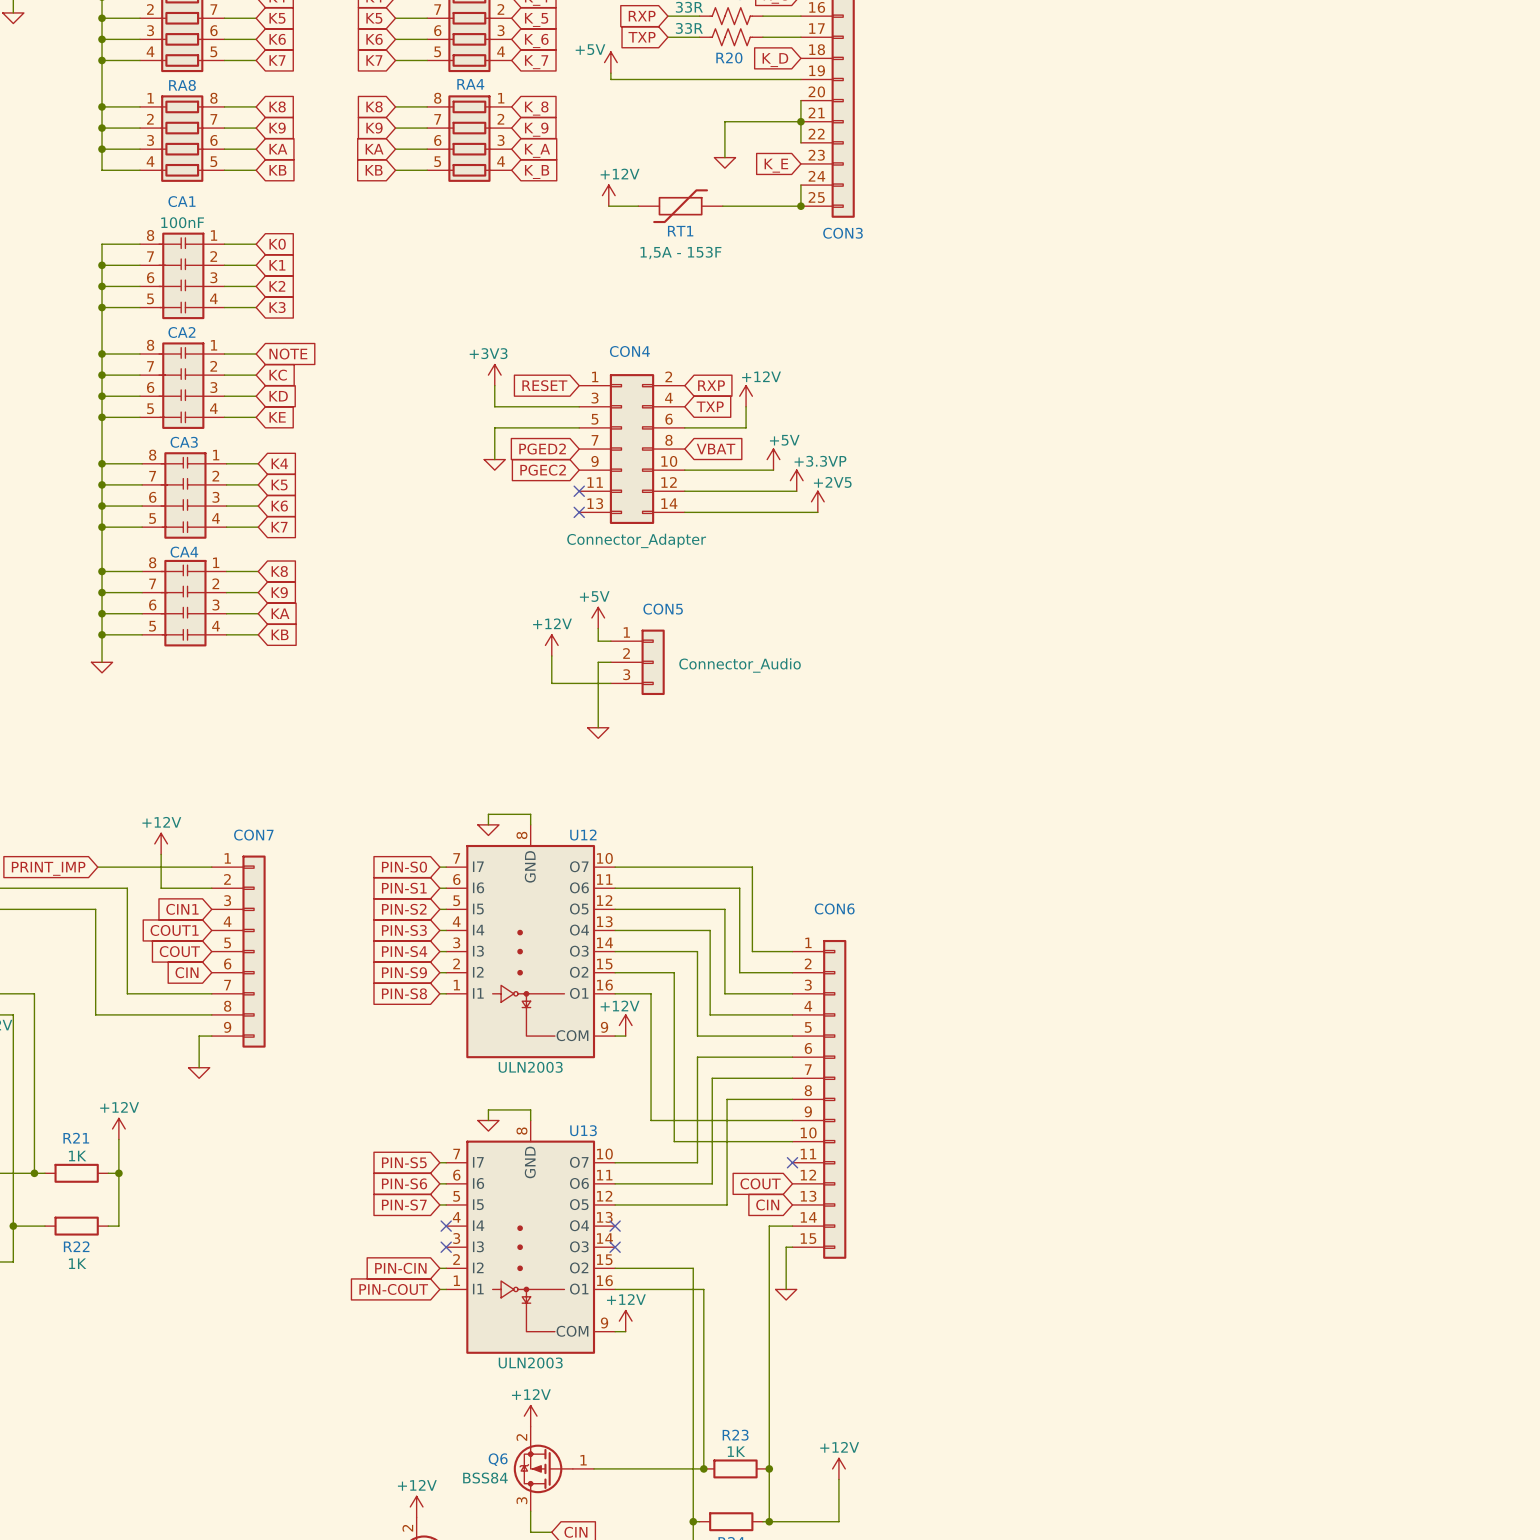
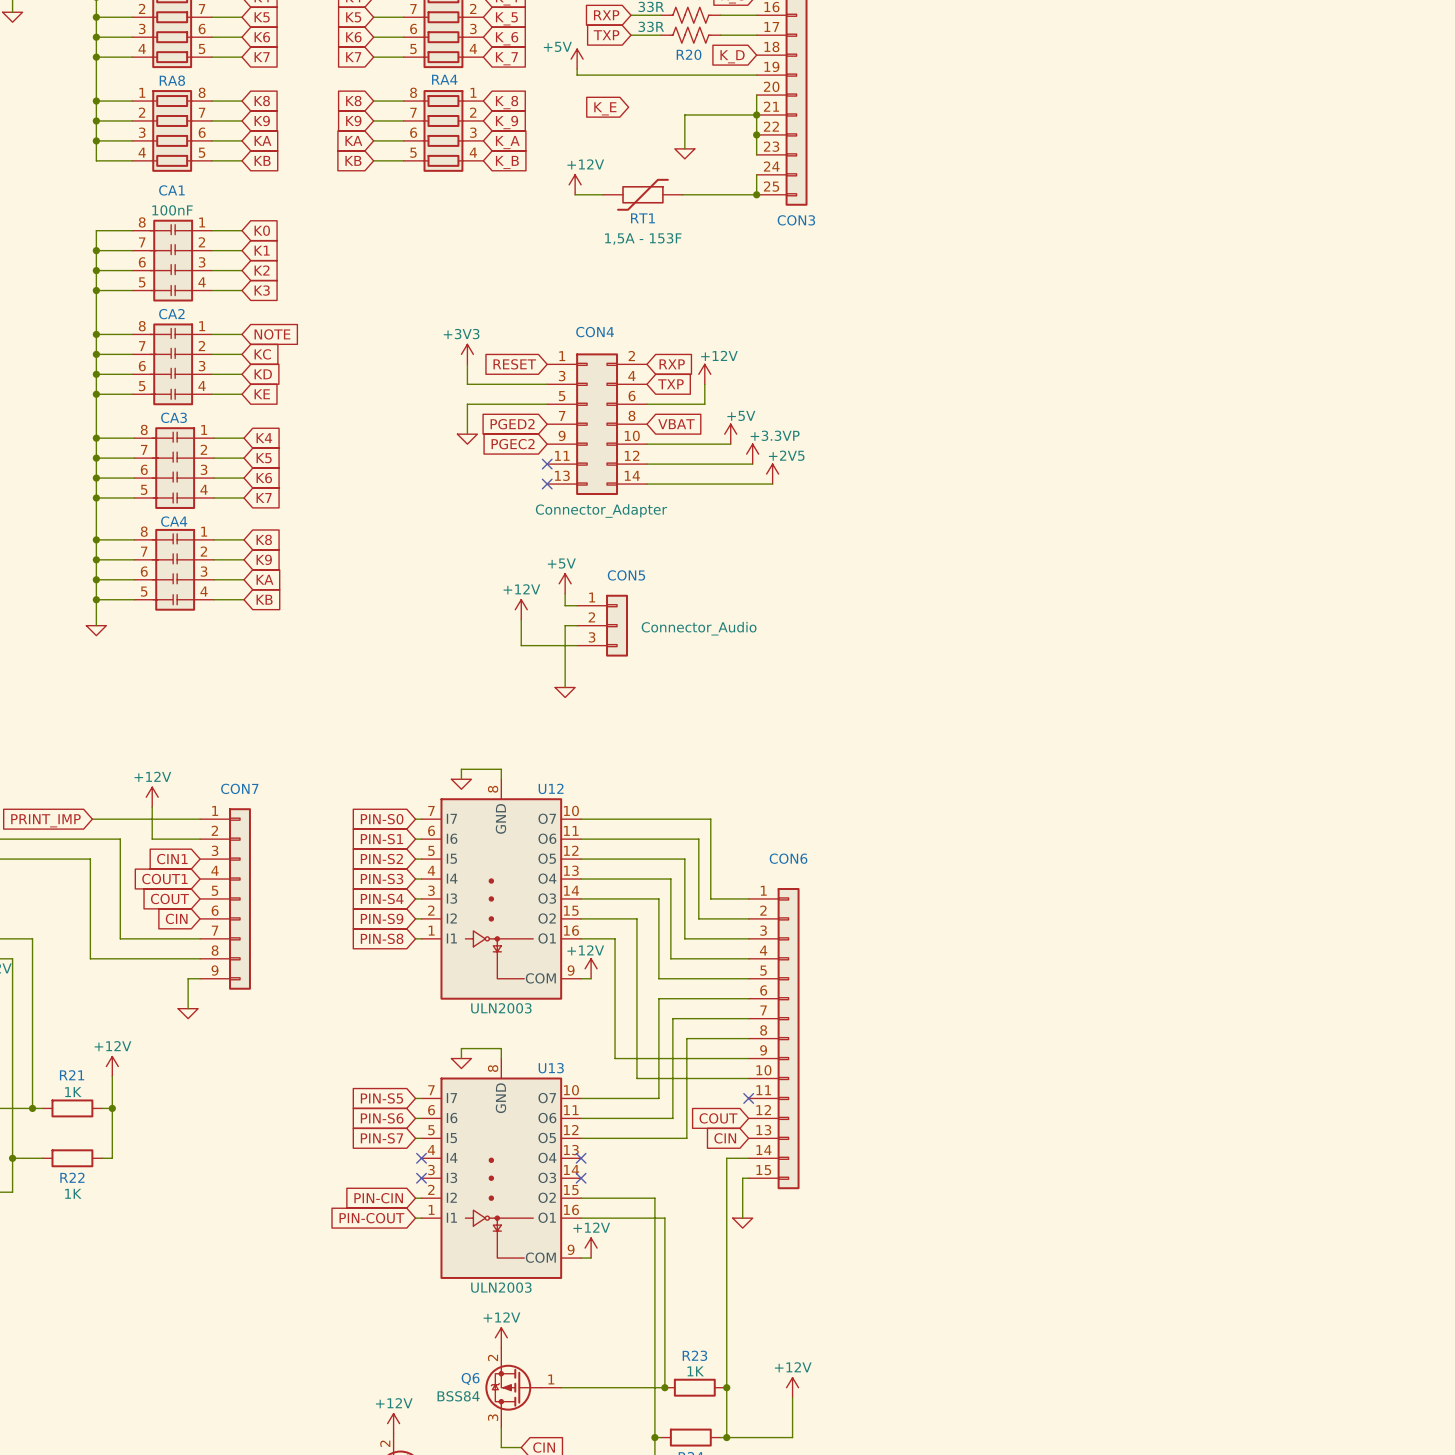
wire: none -> (756, 134) (756, 154)
junction: none -> (756, 134)
global label position: K_E (776, 165) -> K_E (605, 108)

